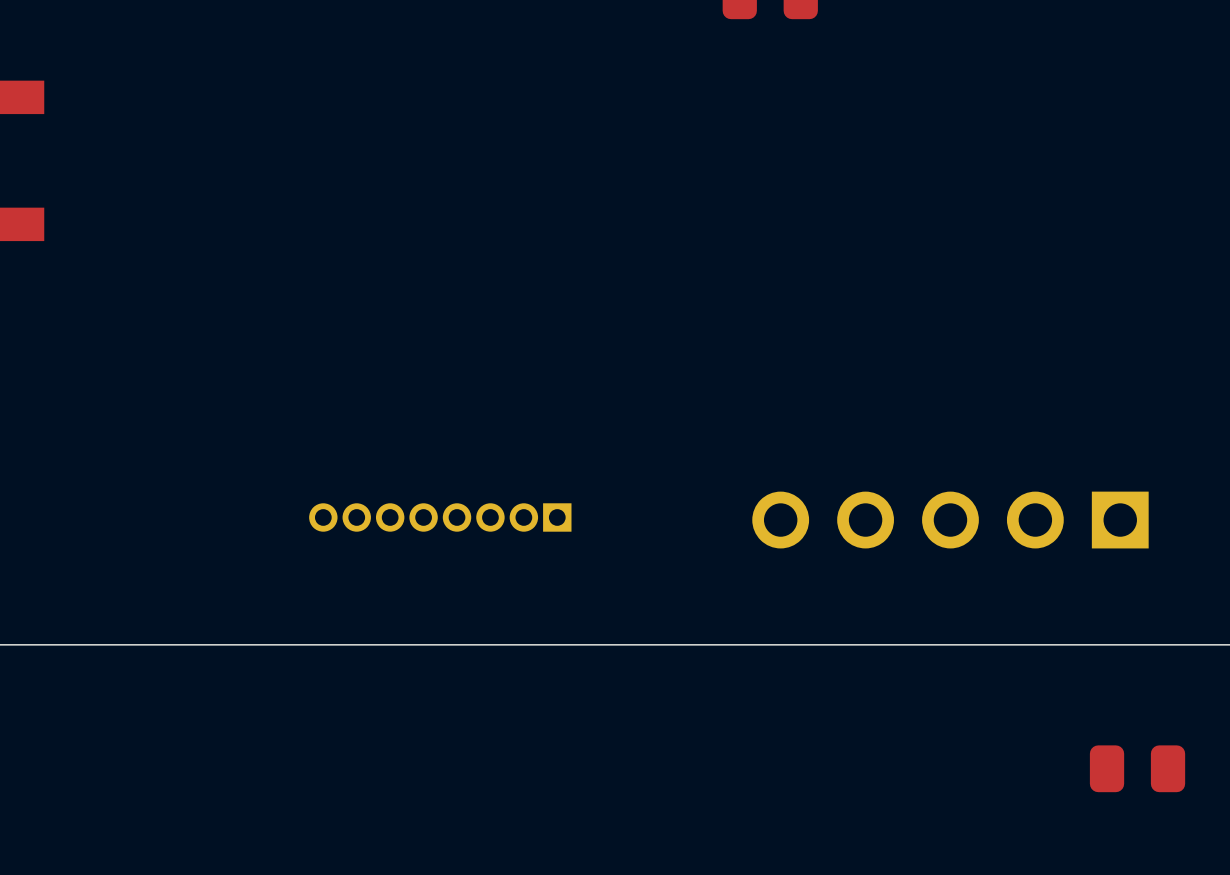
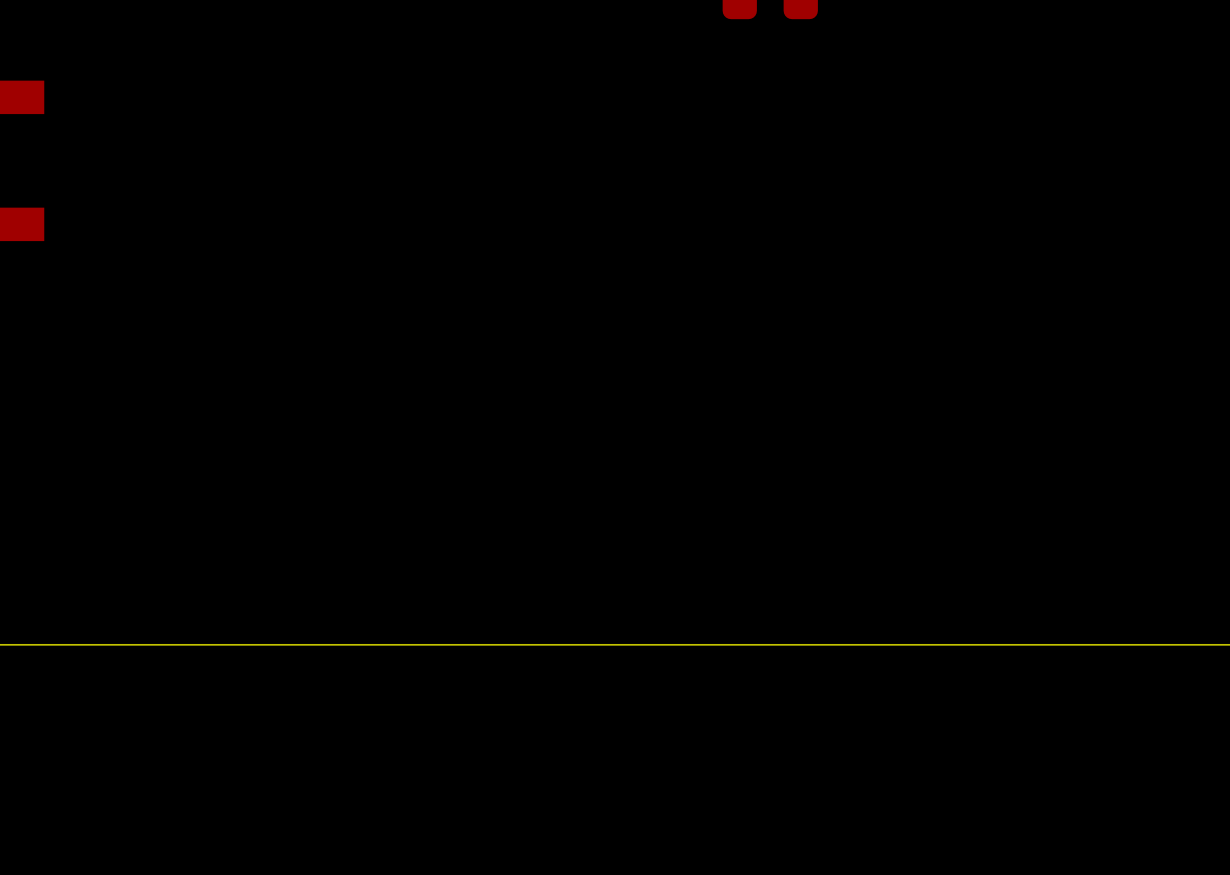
part: (440, 517) -> none
part: (950, 520) -> none
part: (1137, 768) -> none

